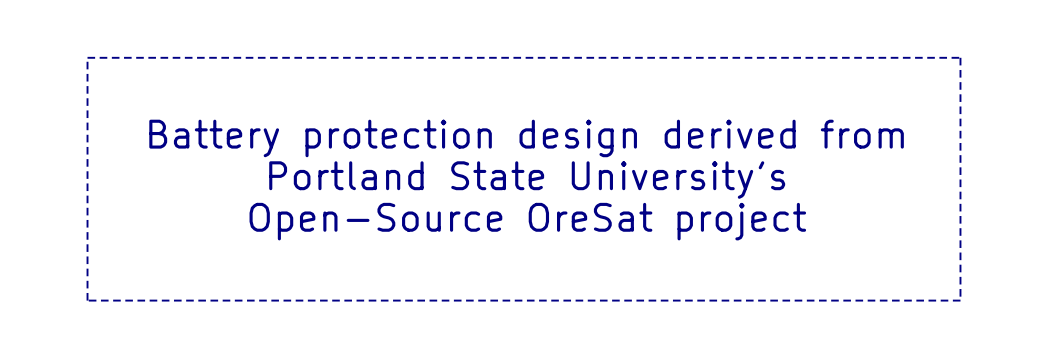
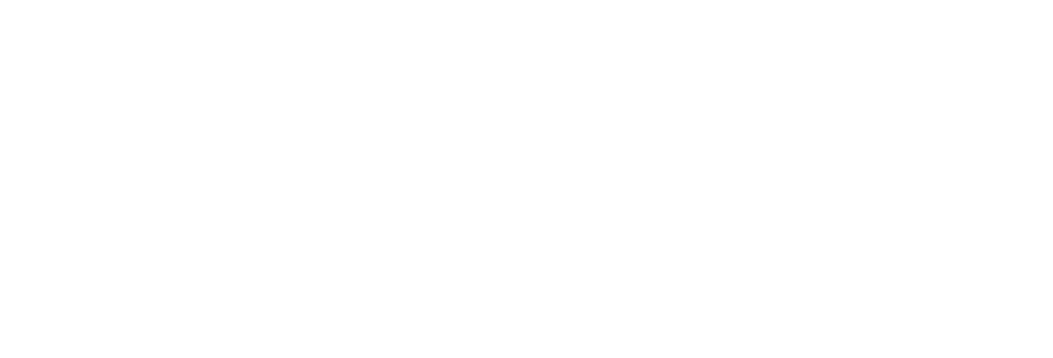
line: (87, 57) (960, 57) (960, 300) (87, 300) (87, 57) -> none
text: Battery protection design derived from (526, 138) -> none
text: Portland State University's (527, 180) -> none
text: Open-Source OreSat project (527, 221) -> none

